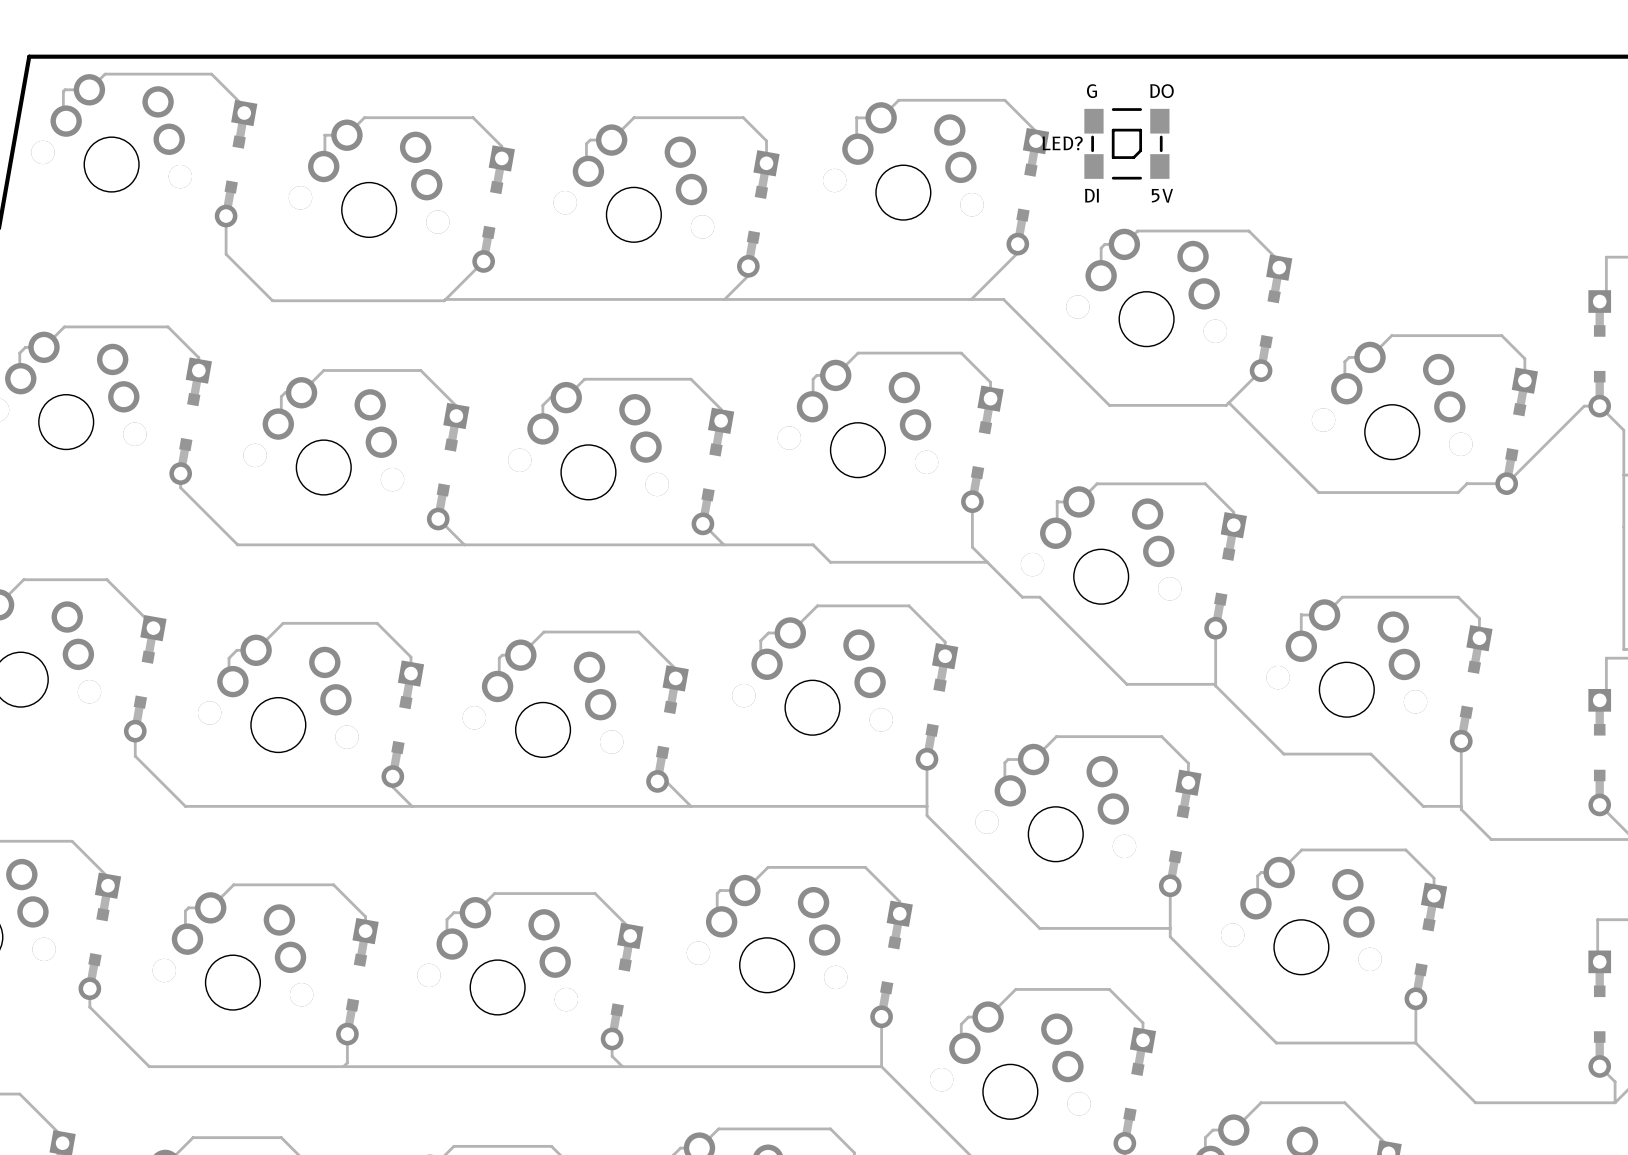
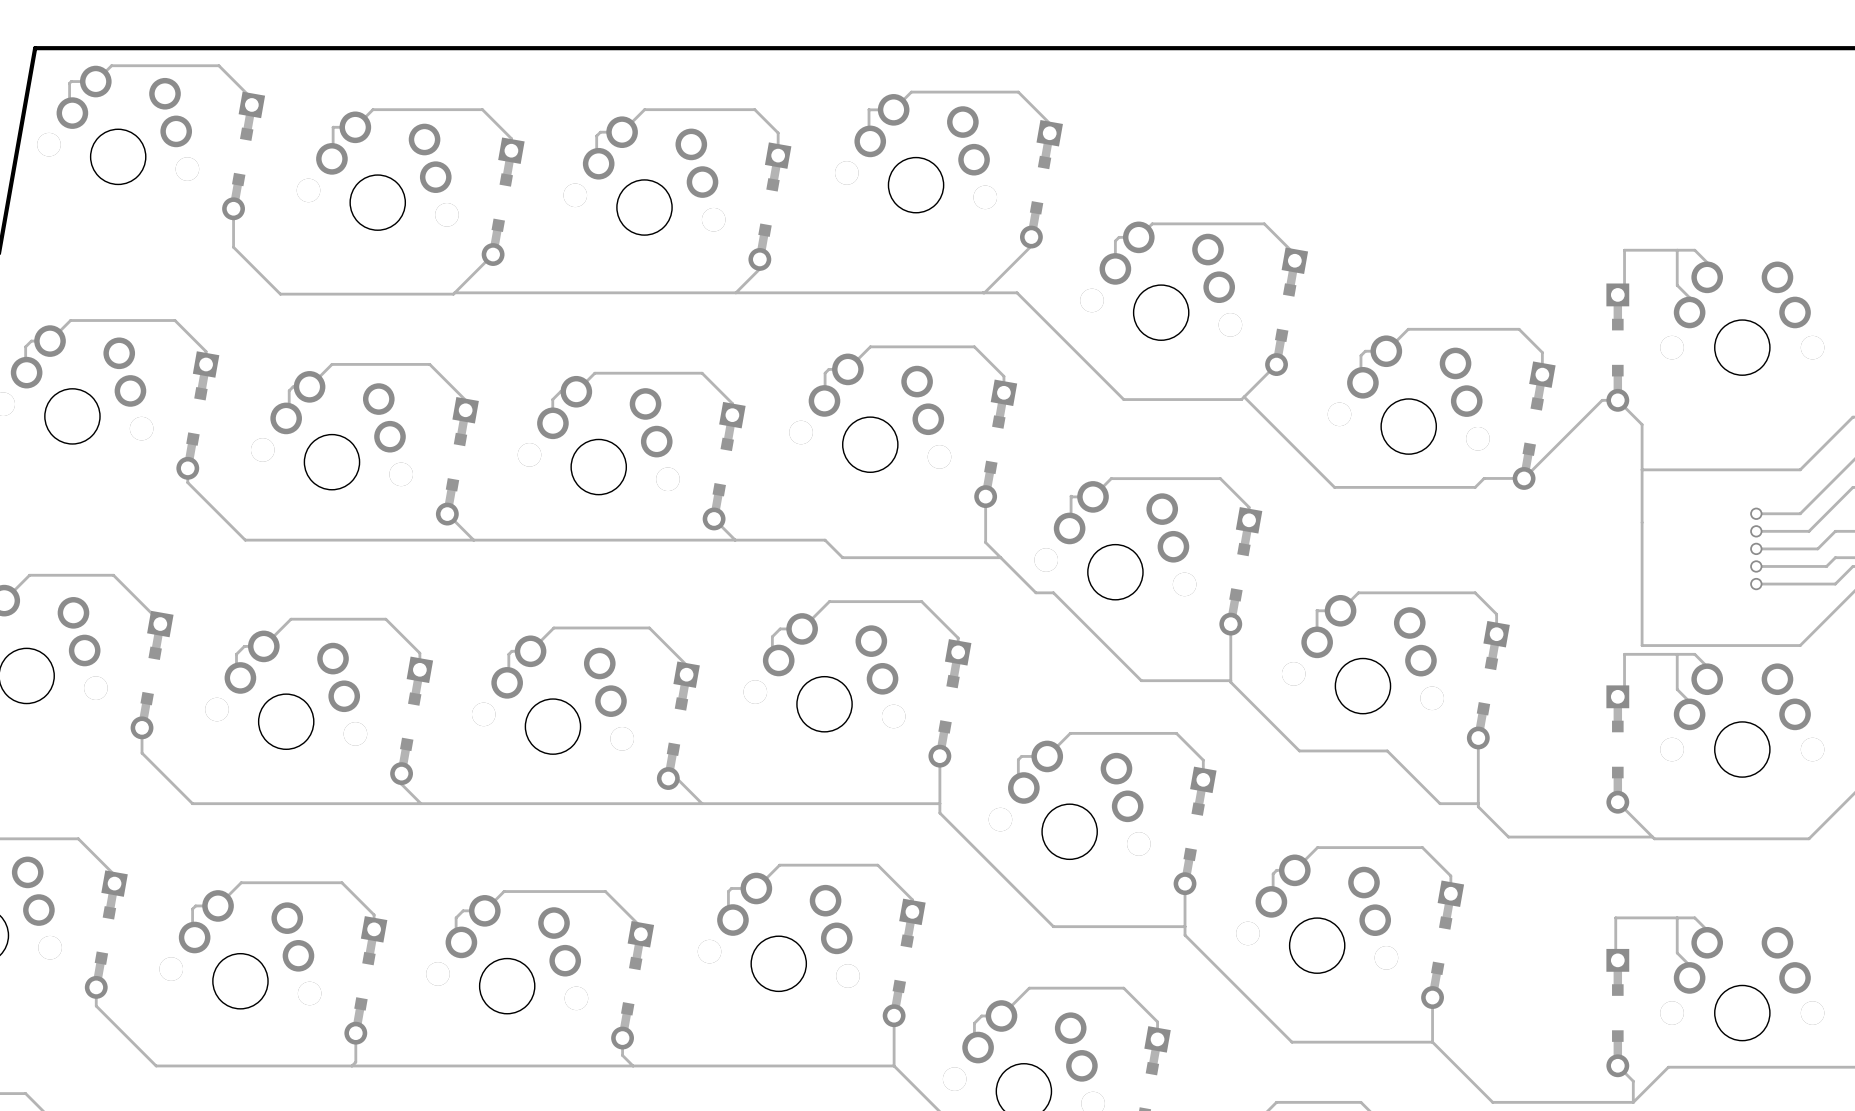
LED?: (1126, 143) -> none

